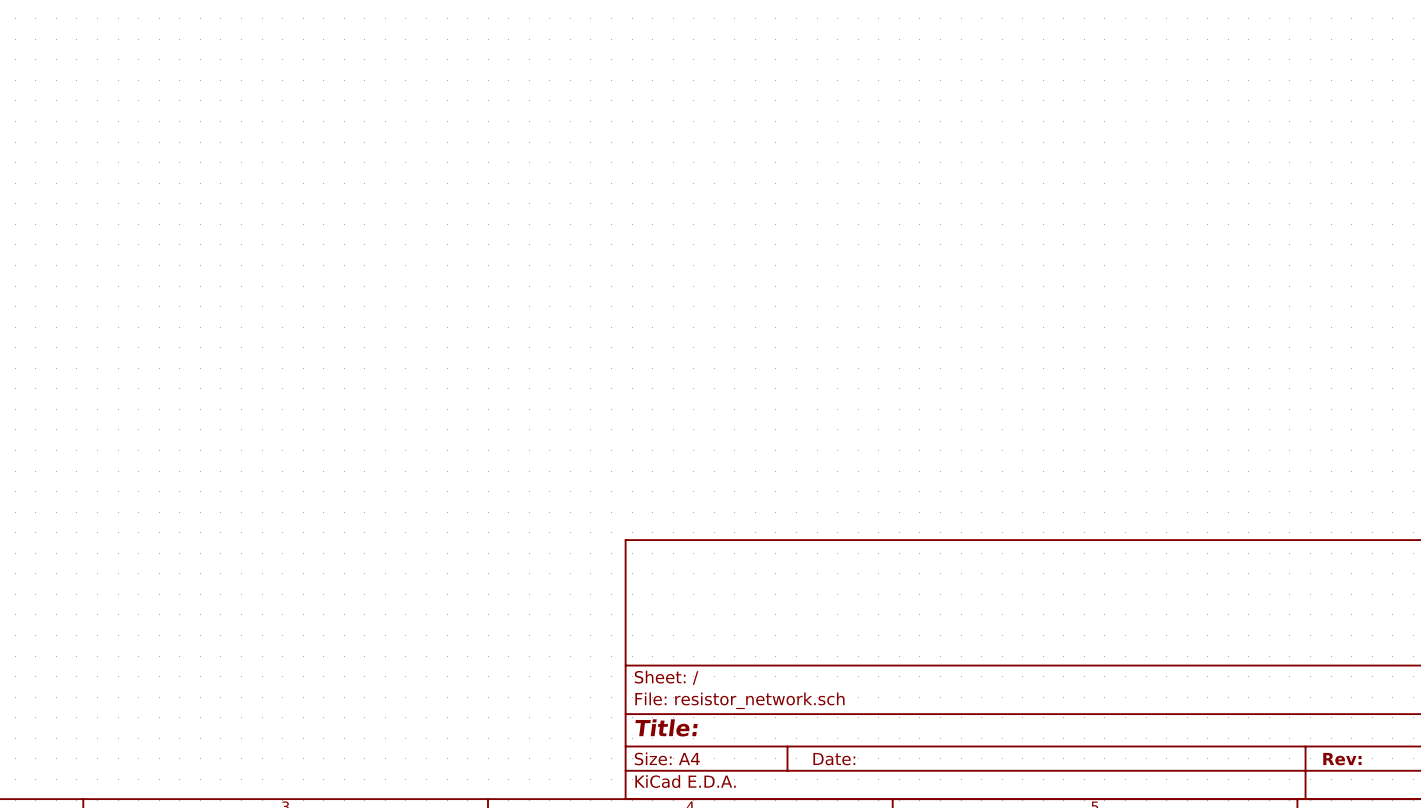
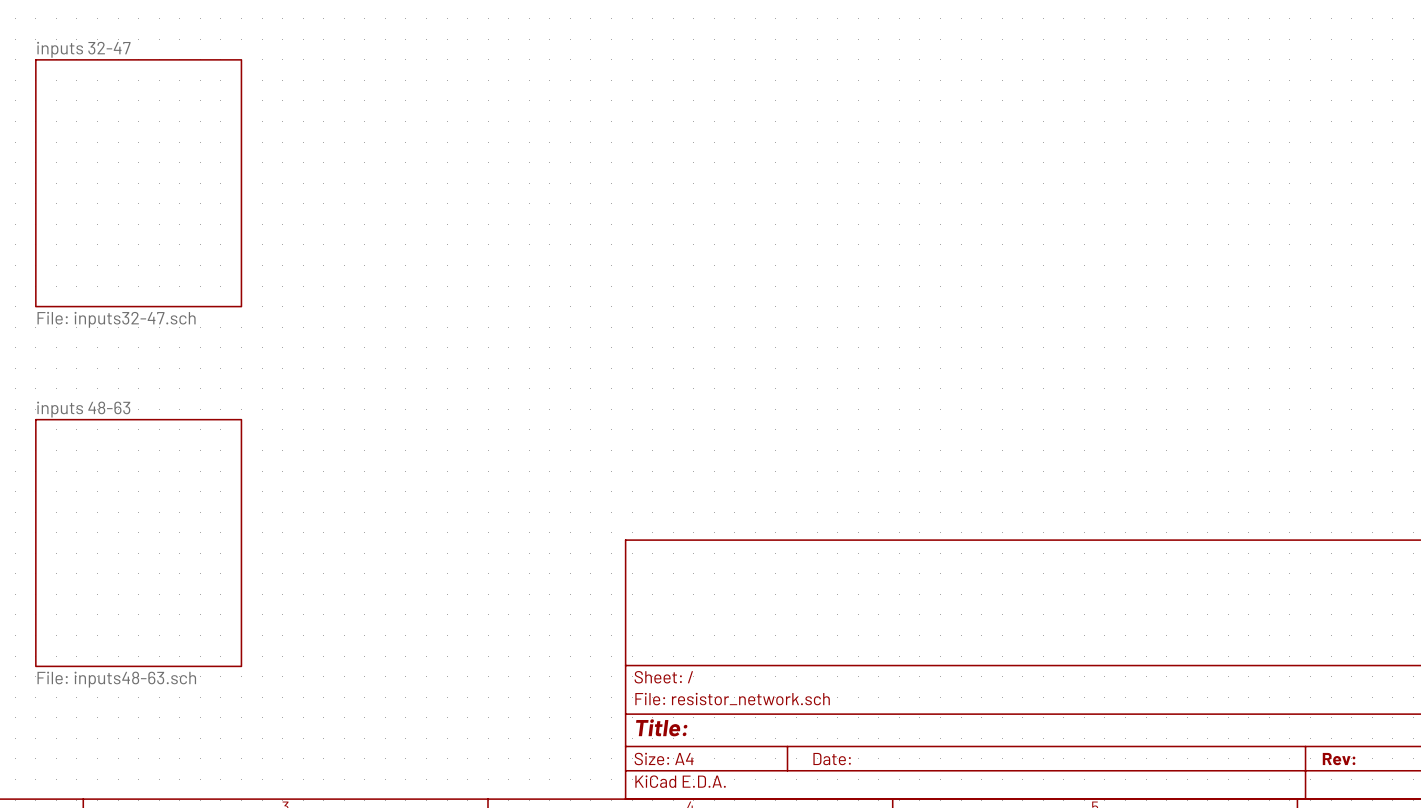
sheet inputs 32-47: none -> File: inputs32-47.sch (138, 183)
sheet inputs 48-63: none -> File: inputs48-63.sch (138, 543)

